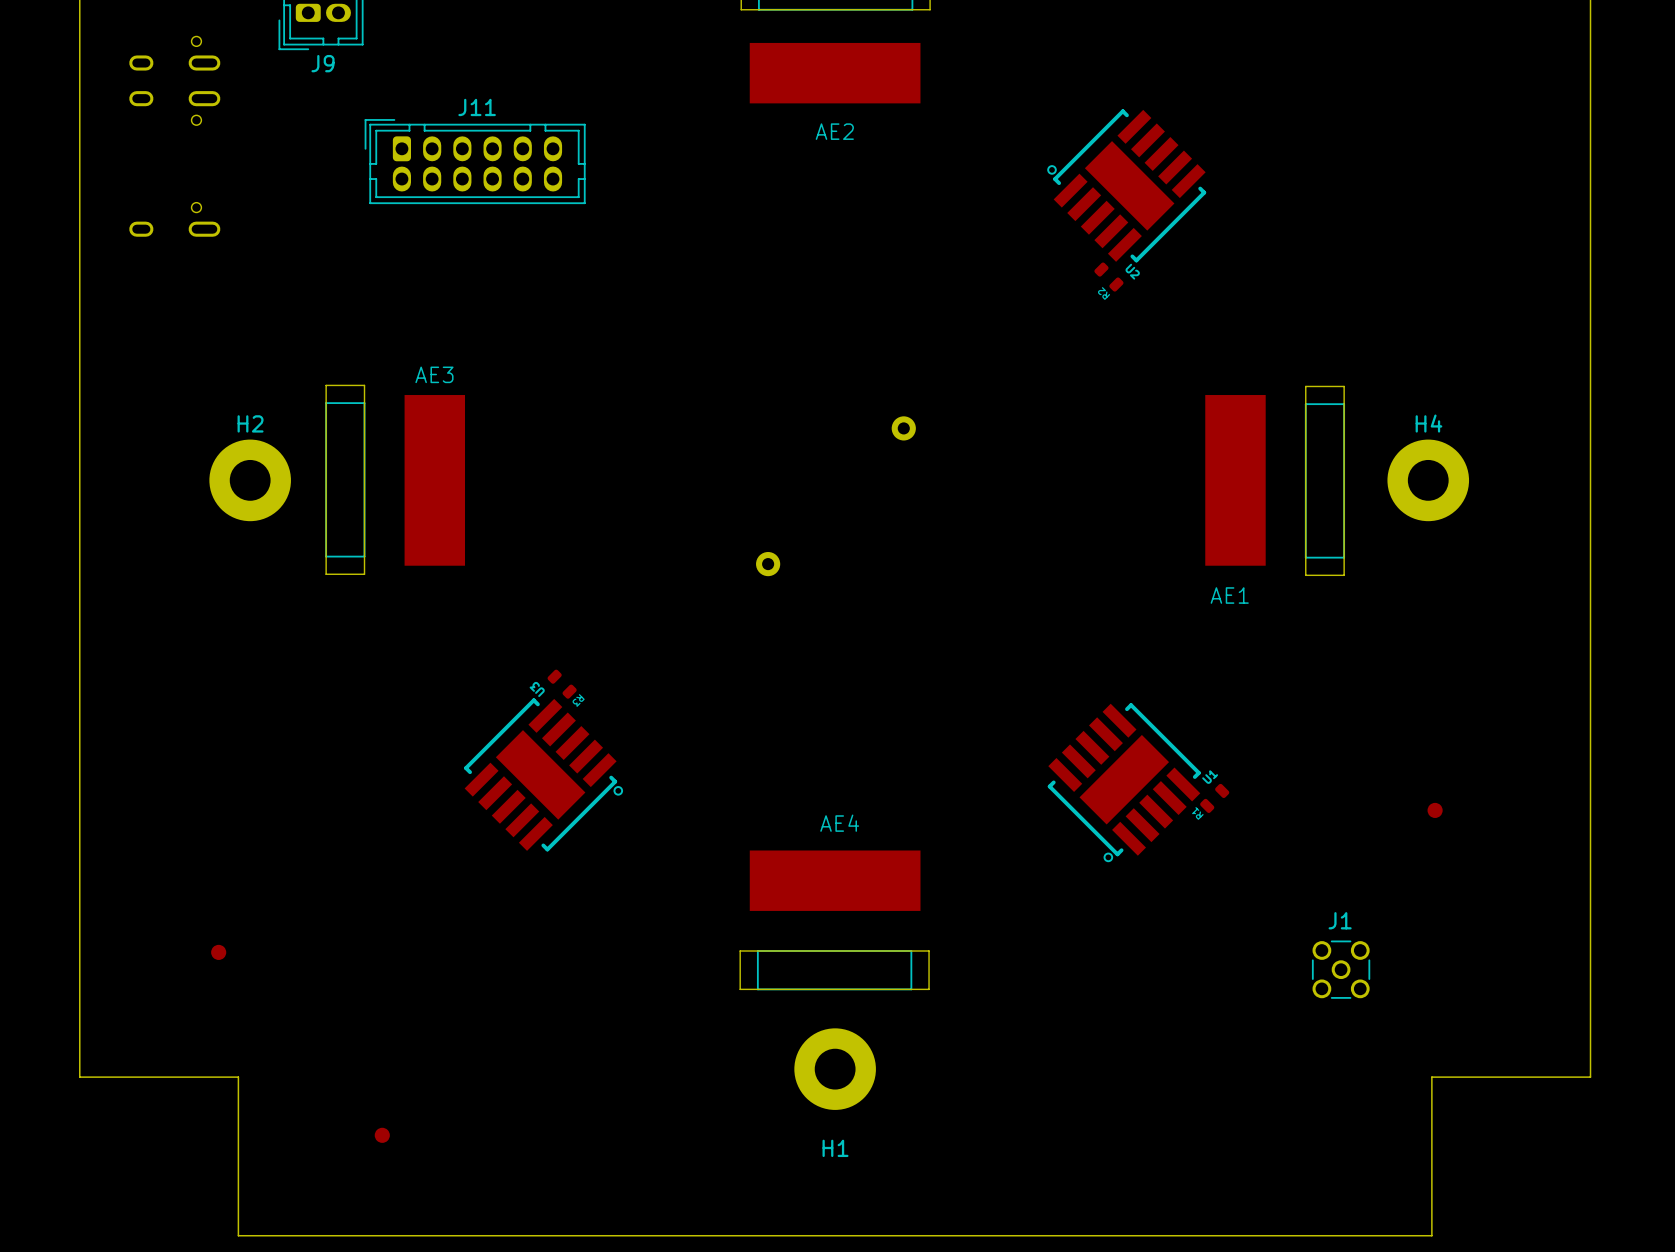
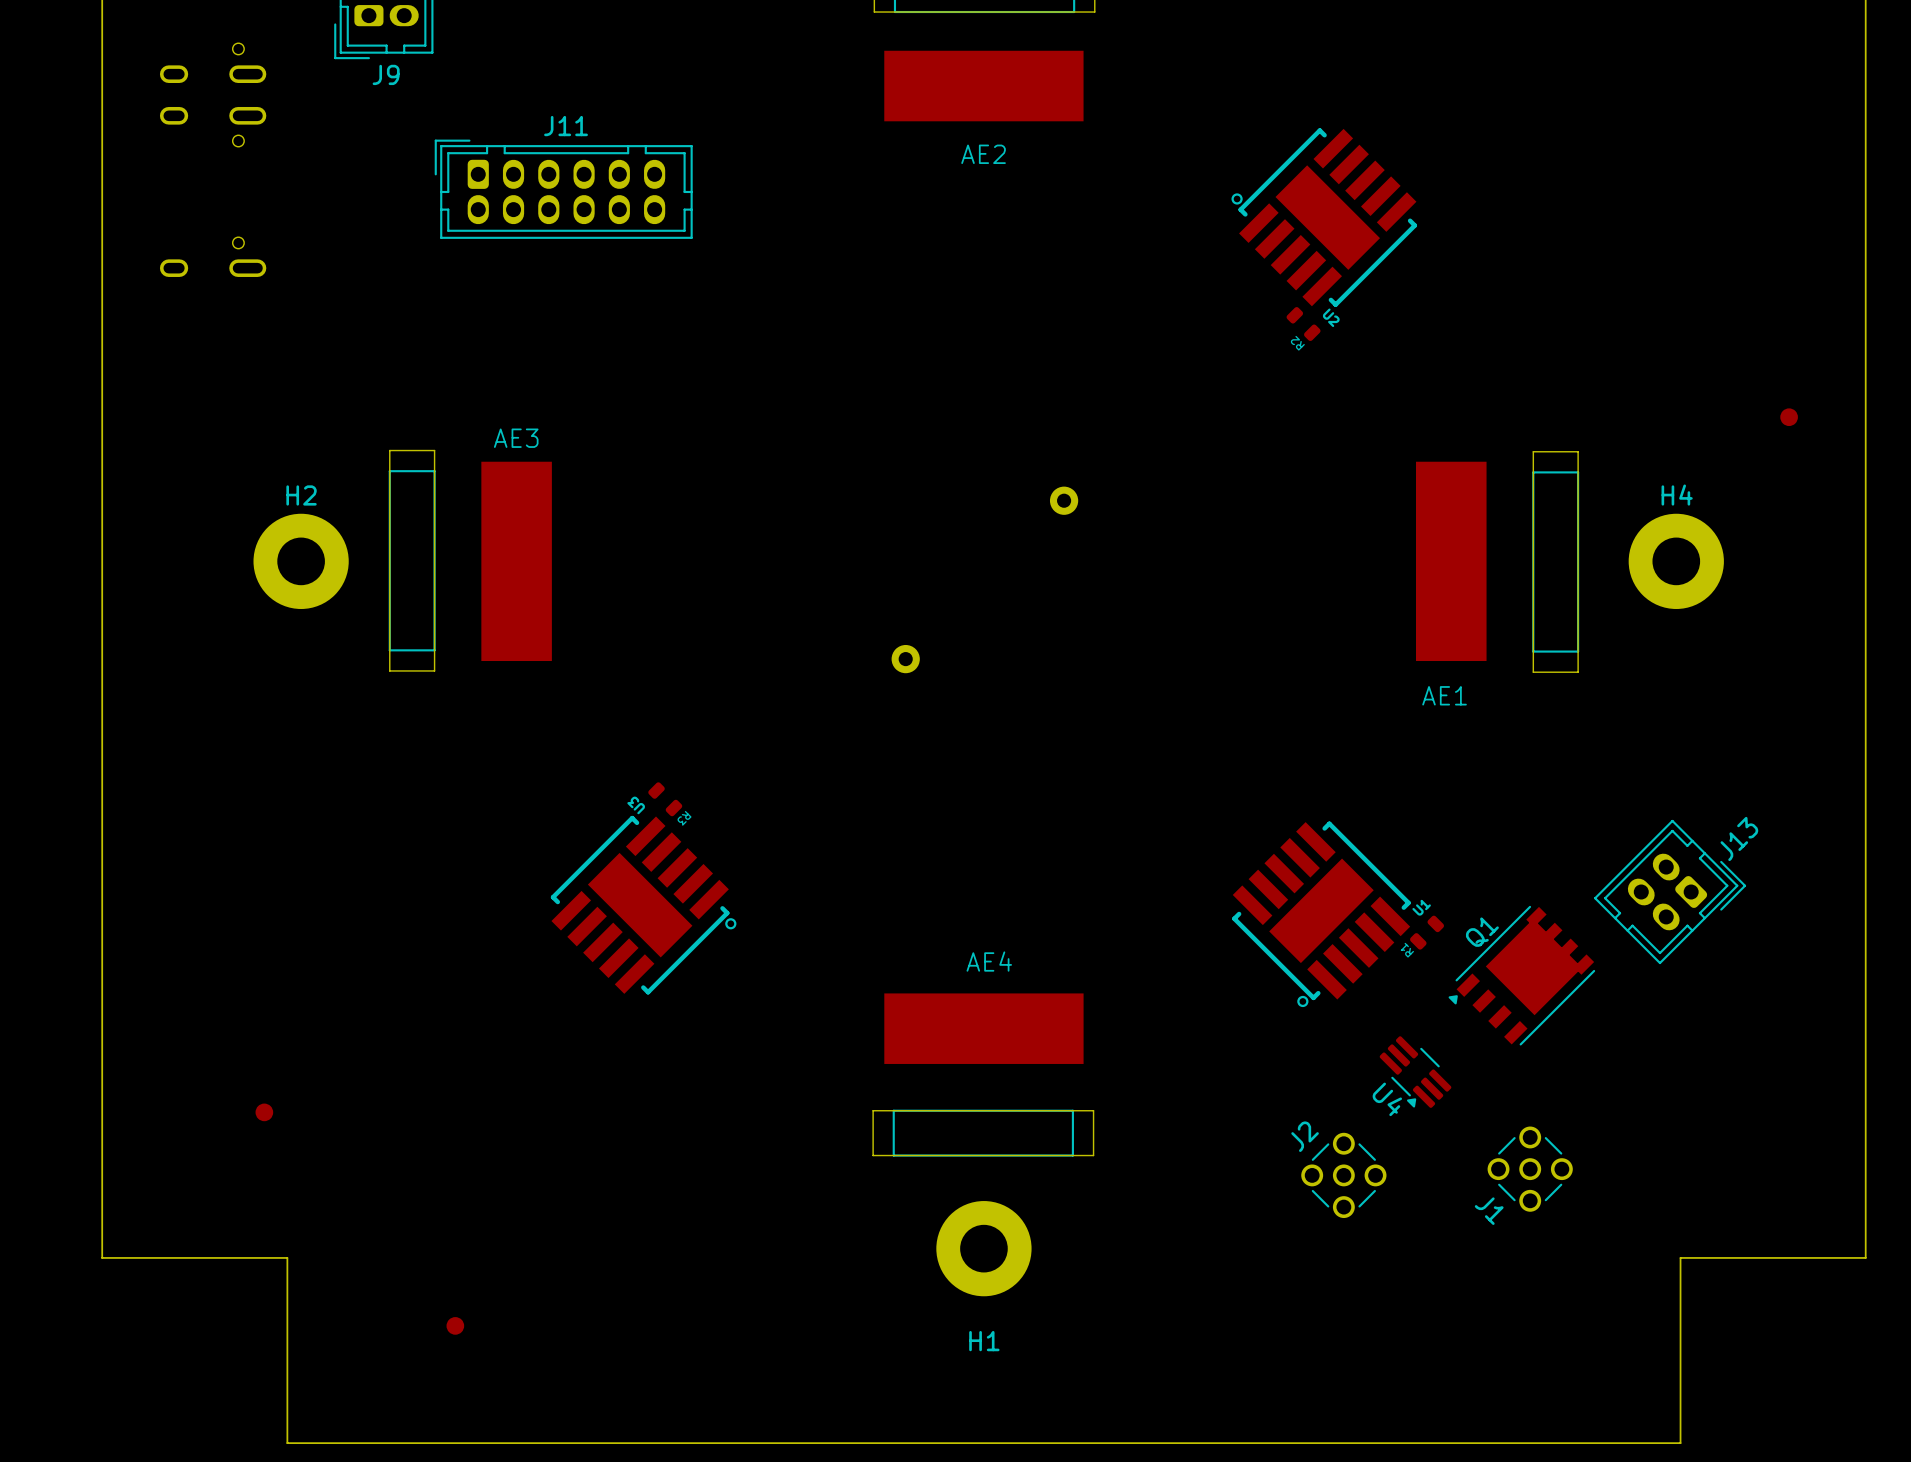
part: none -> (1789, 417)
J13: none -> (1670, 892)
part: (1435, 810) -> none
Q1: none -> (1521, 975)
U4: none -> (1415, 1072)
J1 name position: J1 (1340, 920) -> J1 (1489, 1211)
J1 rotation: 0° (1341, 969) -> 45° clockwise (1530, 1169)
J1 position: (1341, 969) -> (1530, 1169)
J2: none -> (1343, 1175)

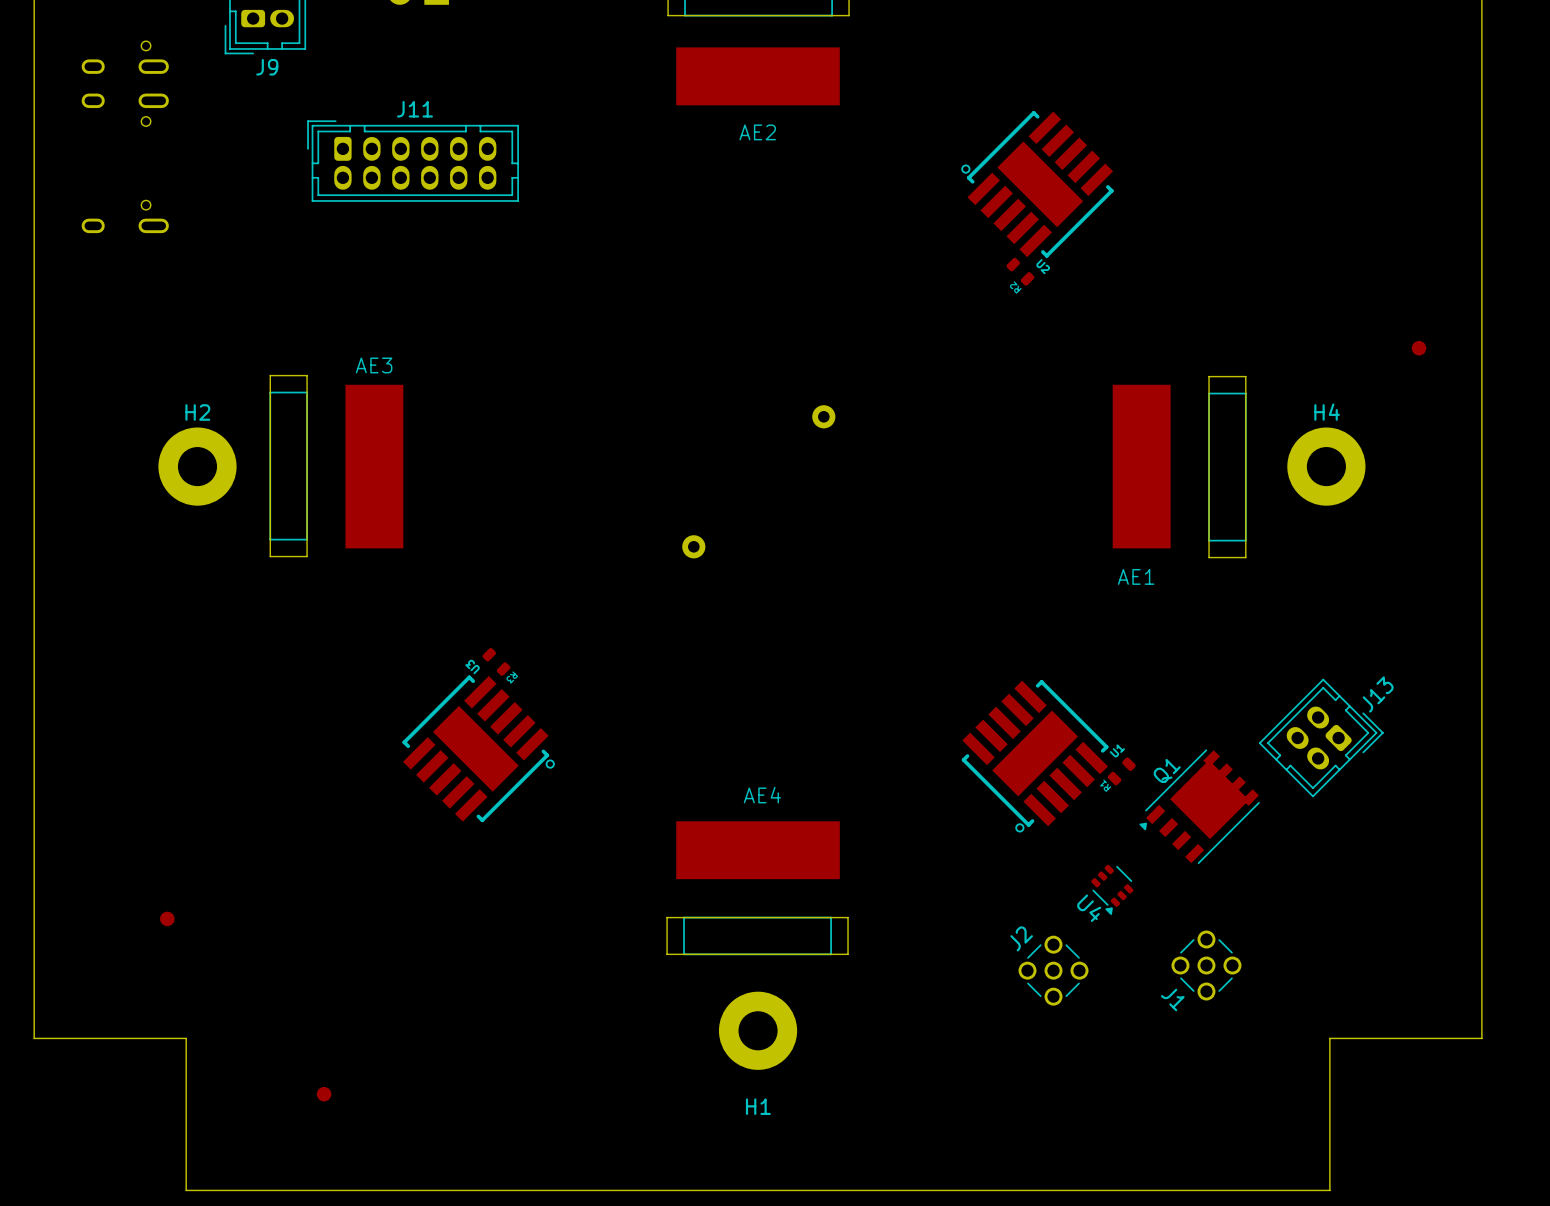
U4 footprint: [1379, 1036, 1452, 1108] -> [1091, 864, 1134, 915]

